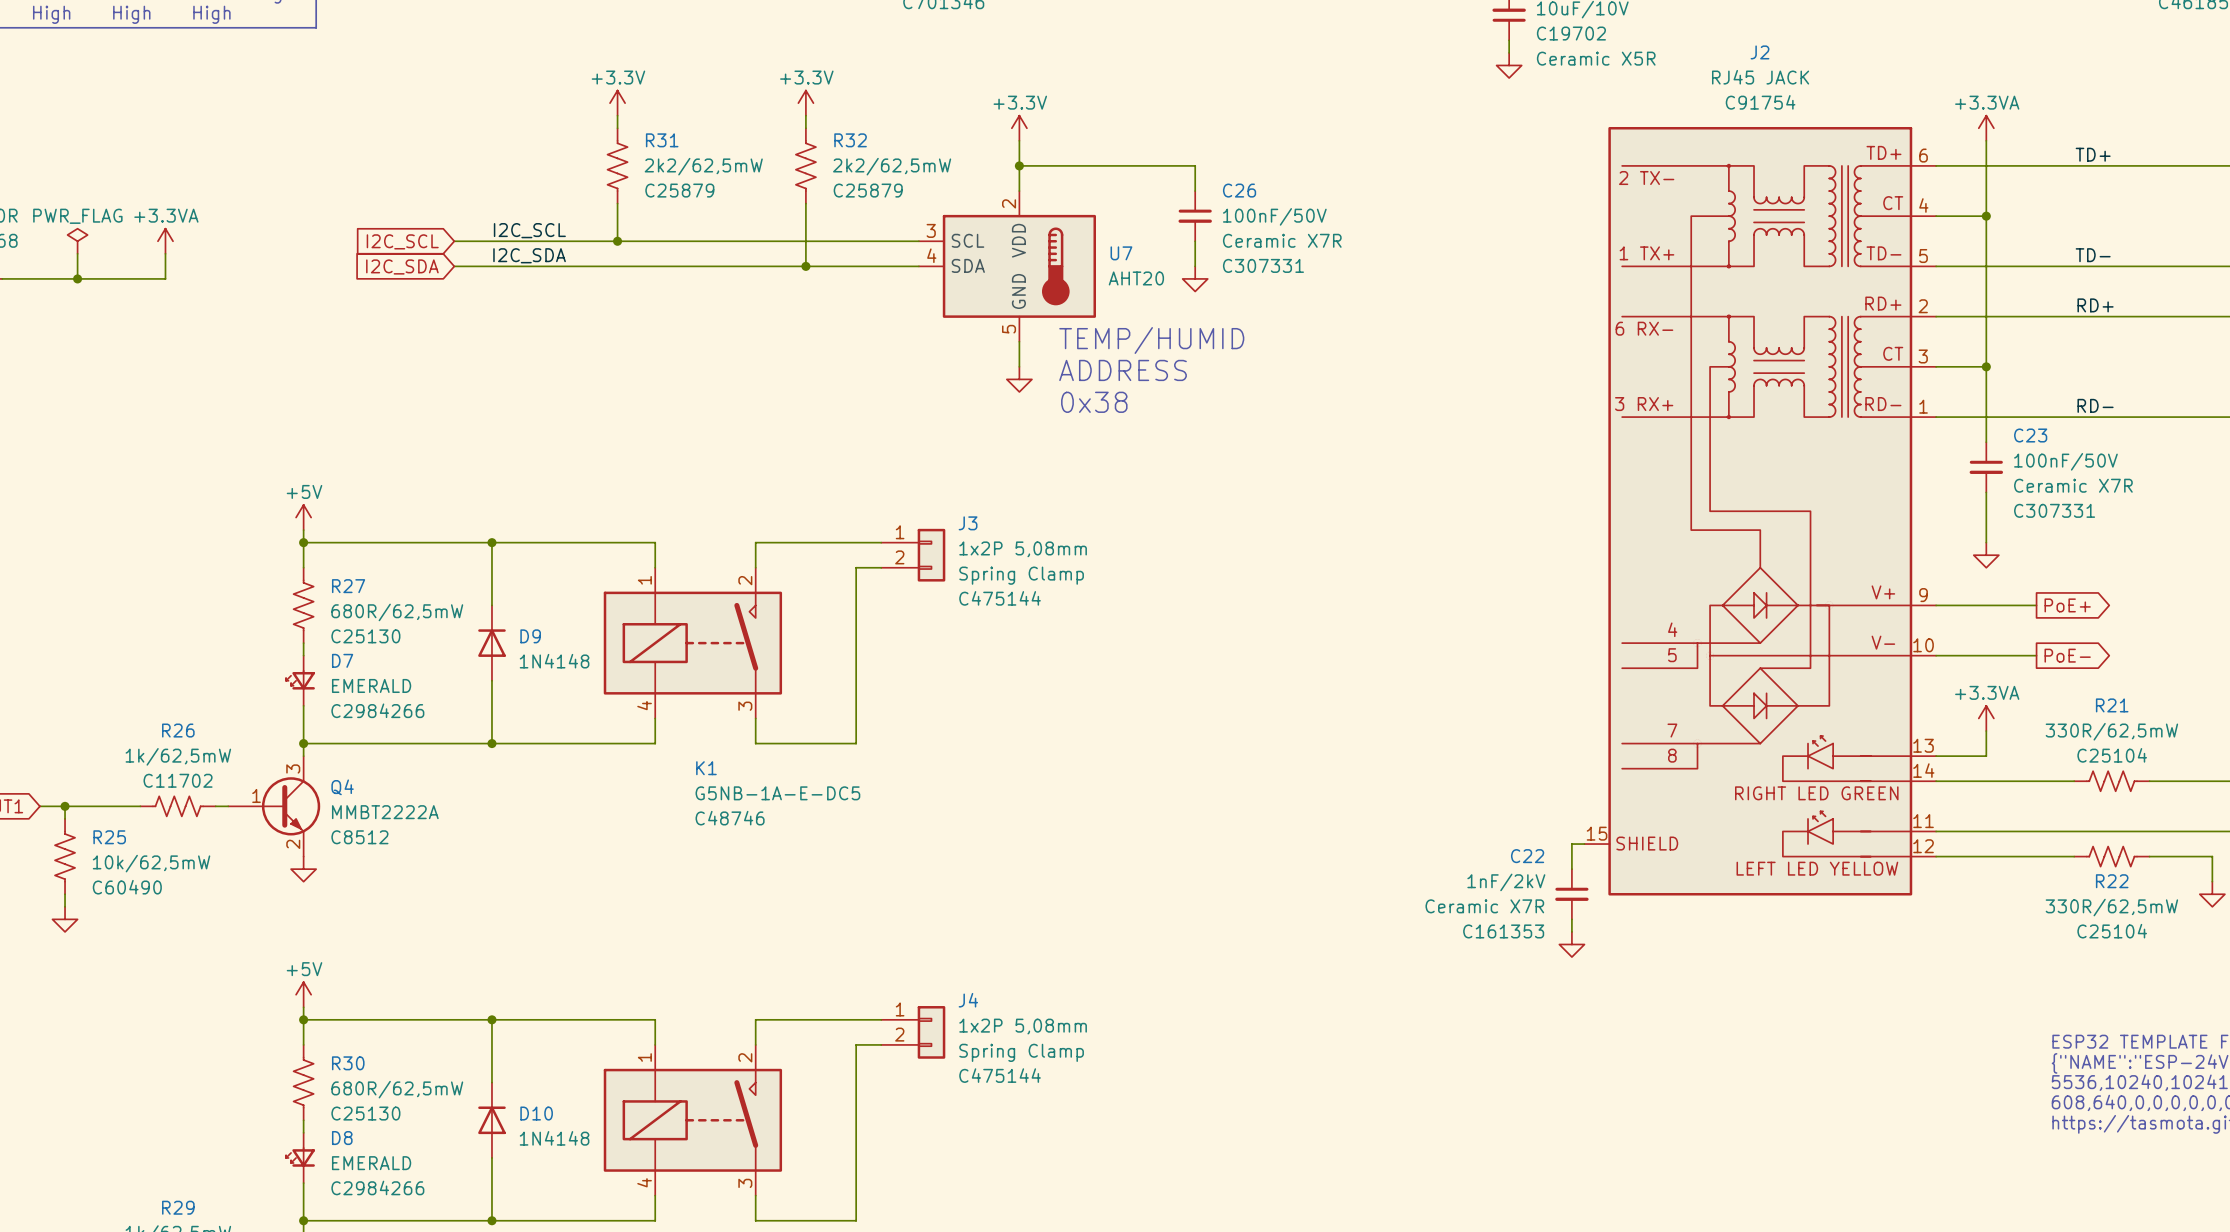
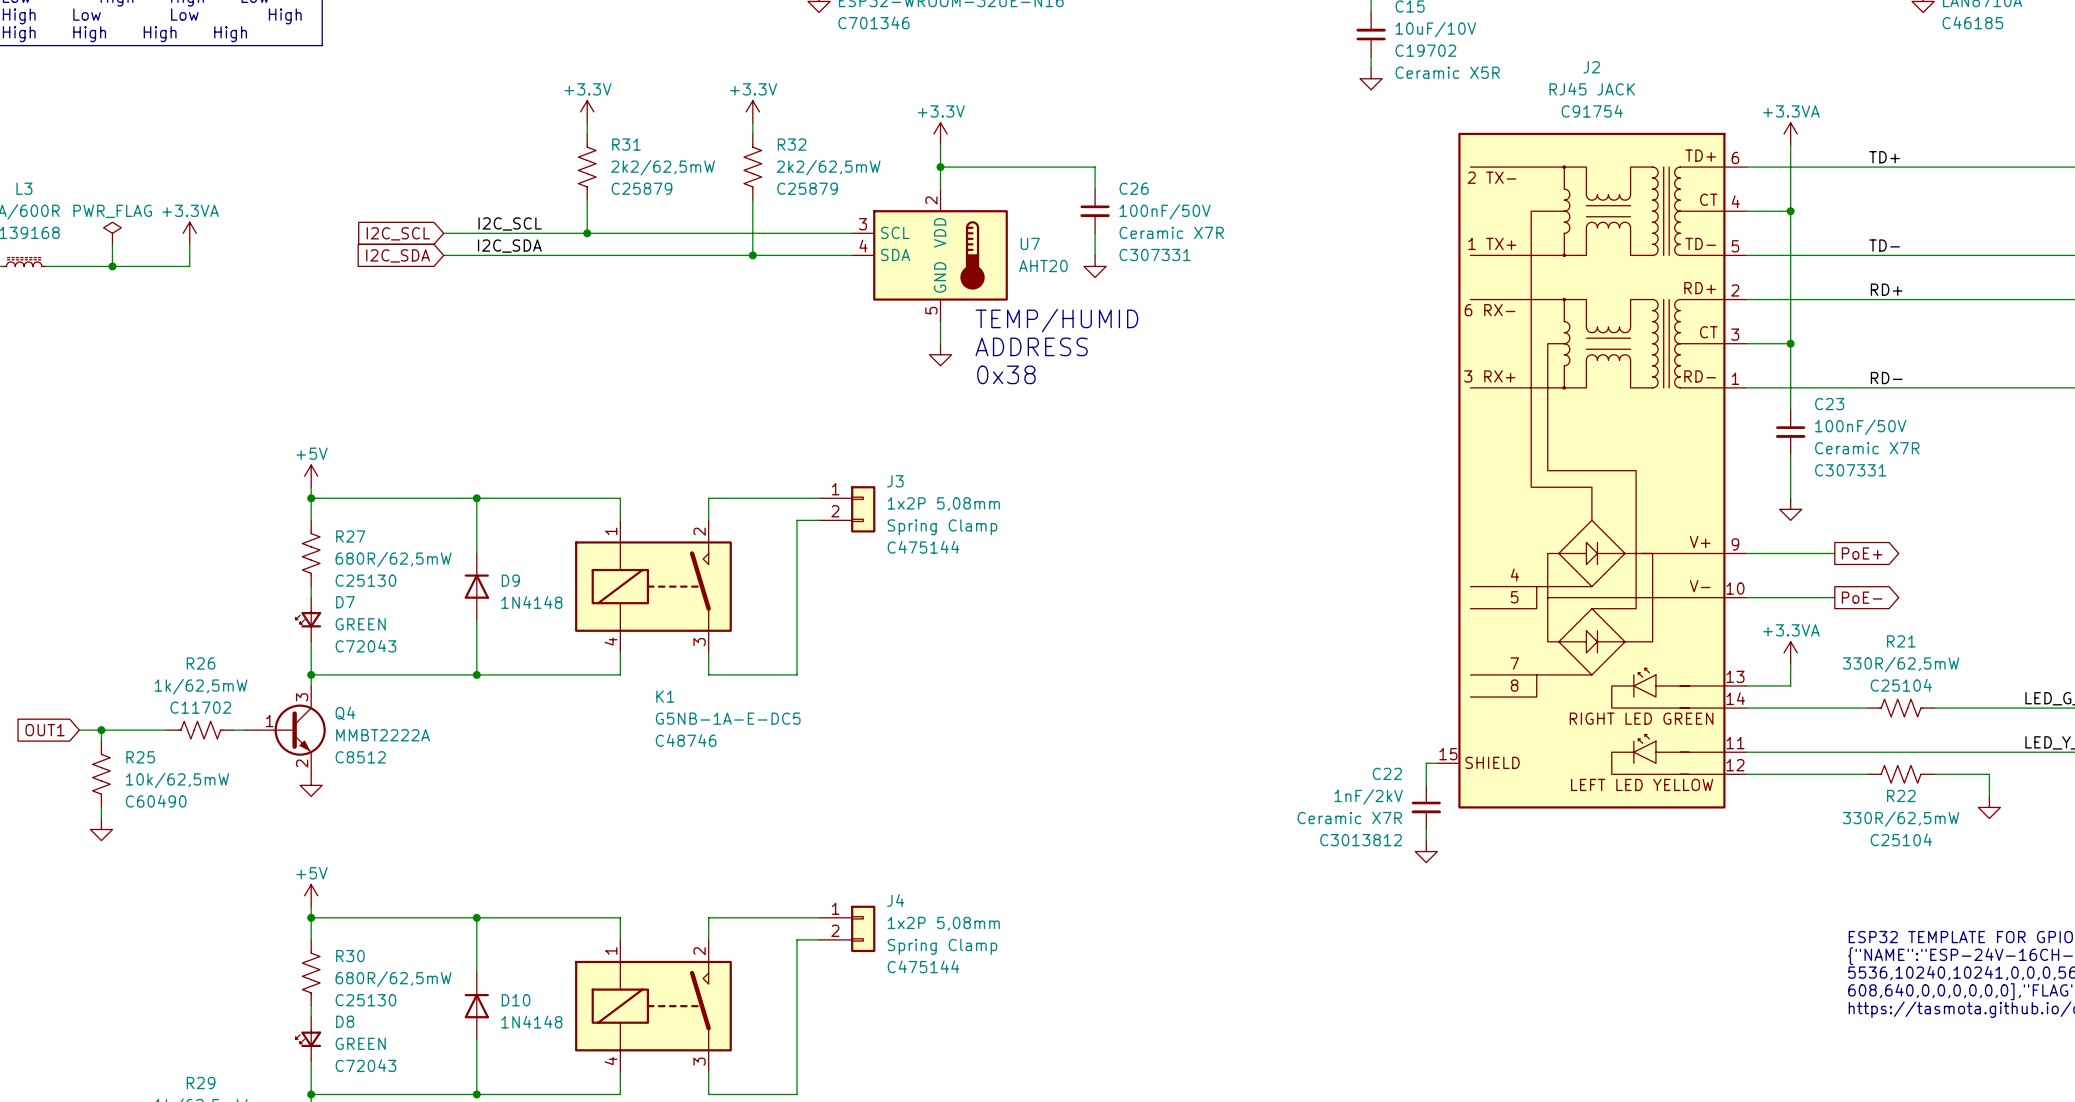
D7 value: EMERALD (371, 685) -> GREEN (360, 624)
D7 text: C2984266 (377, 710) -> C72043 (365, 646)
C22 text: C161353 (1503, 931) -> C3013812 (1361, 840)
D8 value: EMERALD (371, 1163) -> GREEN (360, 1043)
D8 text: C2984266 (377, 1187) -> C72043 (365, 1065)

